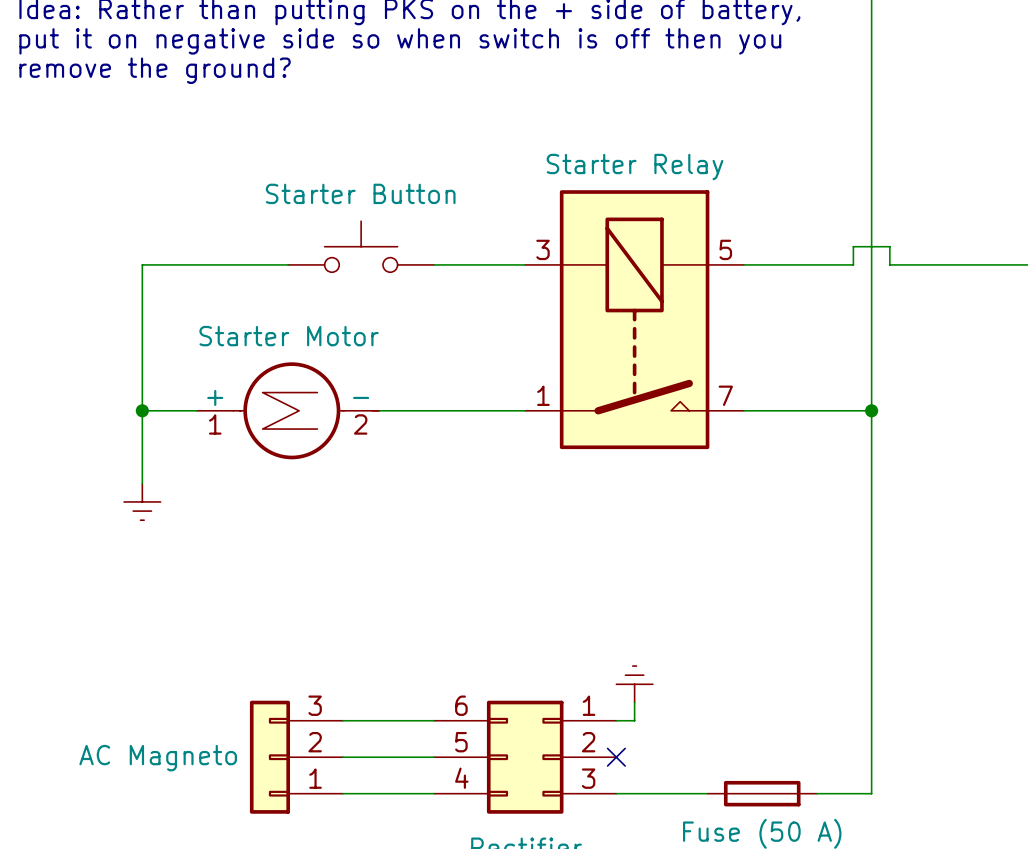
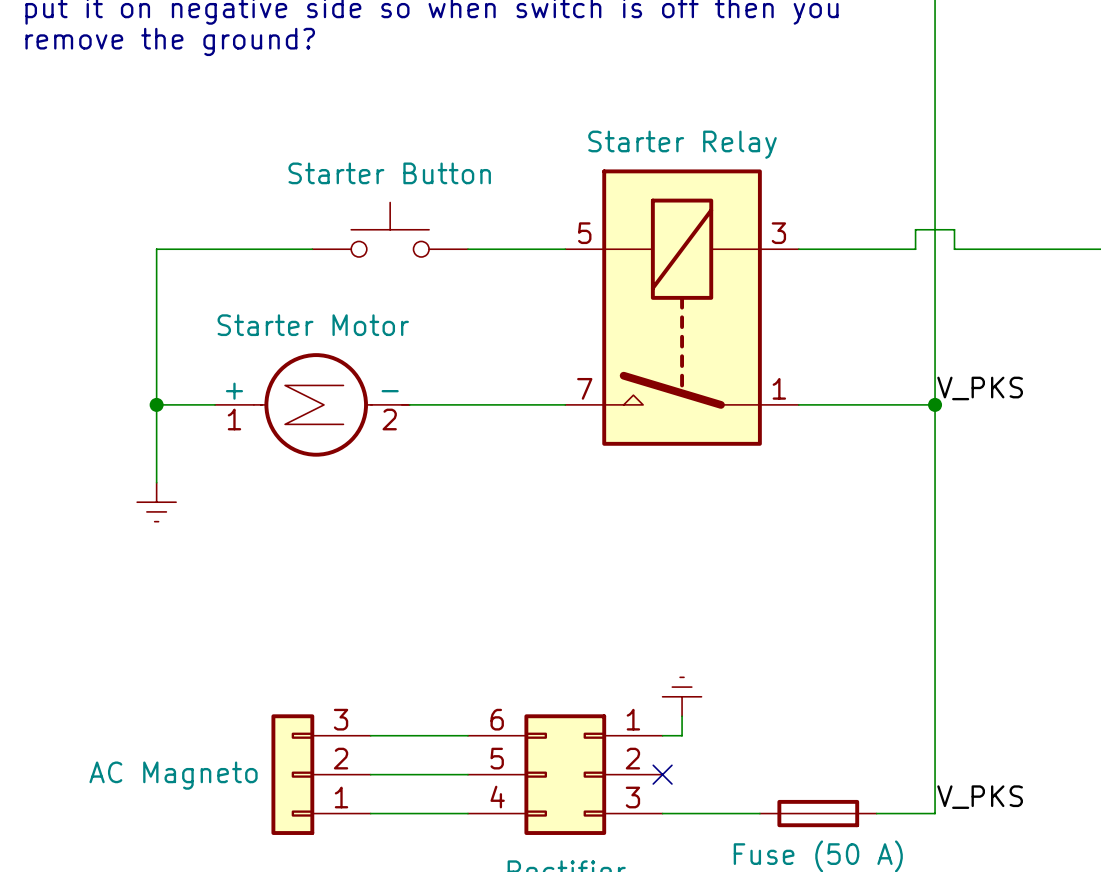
part flip: as is (634, 319) -> left-right (682, 307)
label: none -> V_PKS (980, 388)
label: none -> V_PKS (980, 797)

